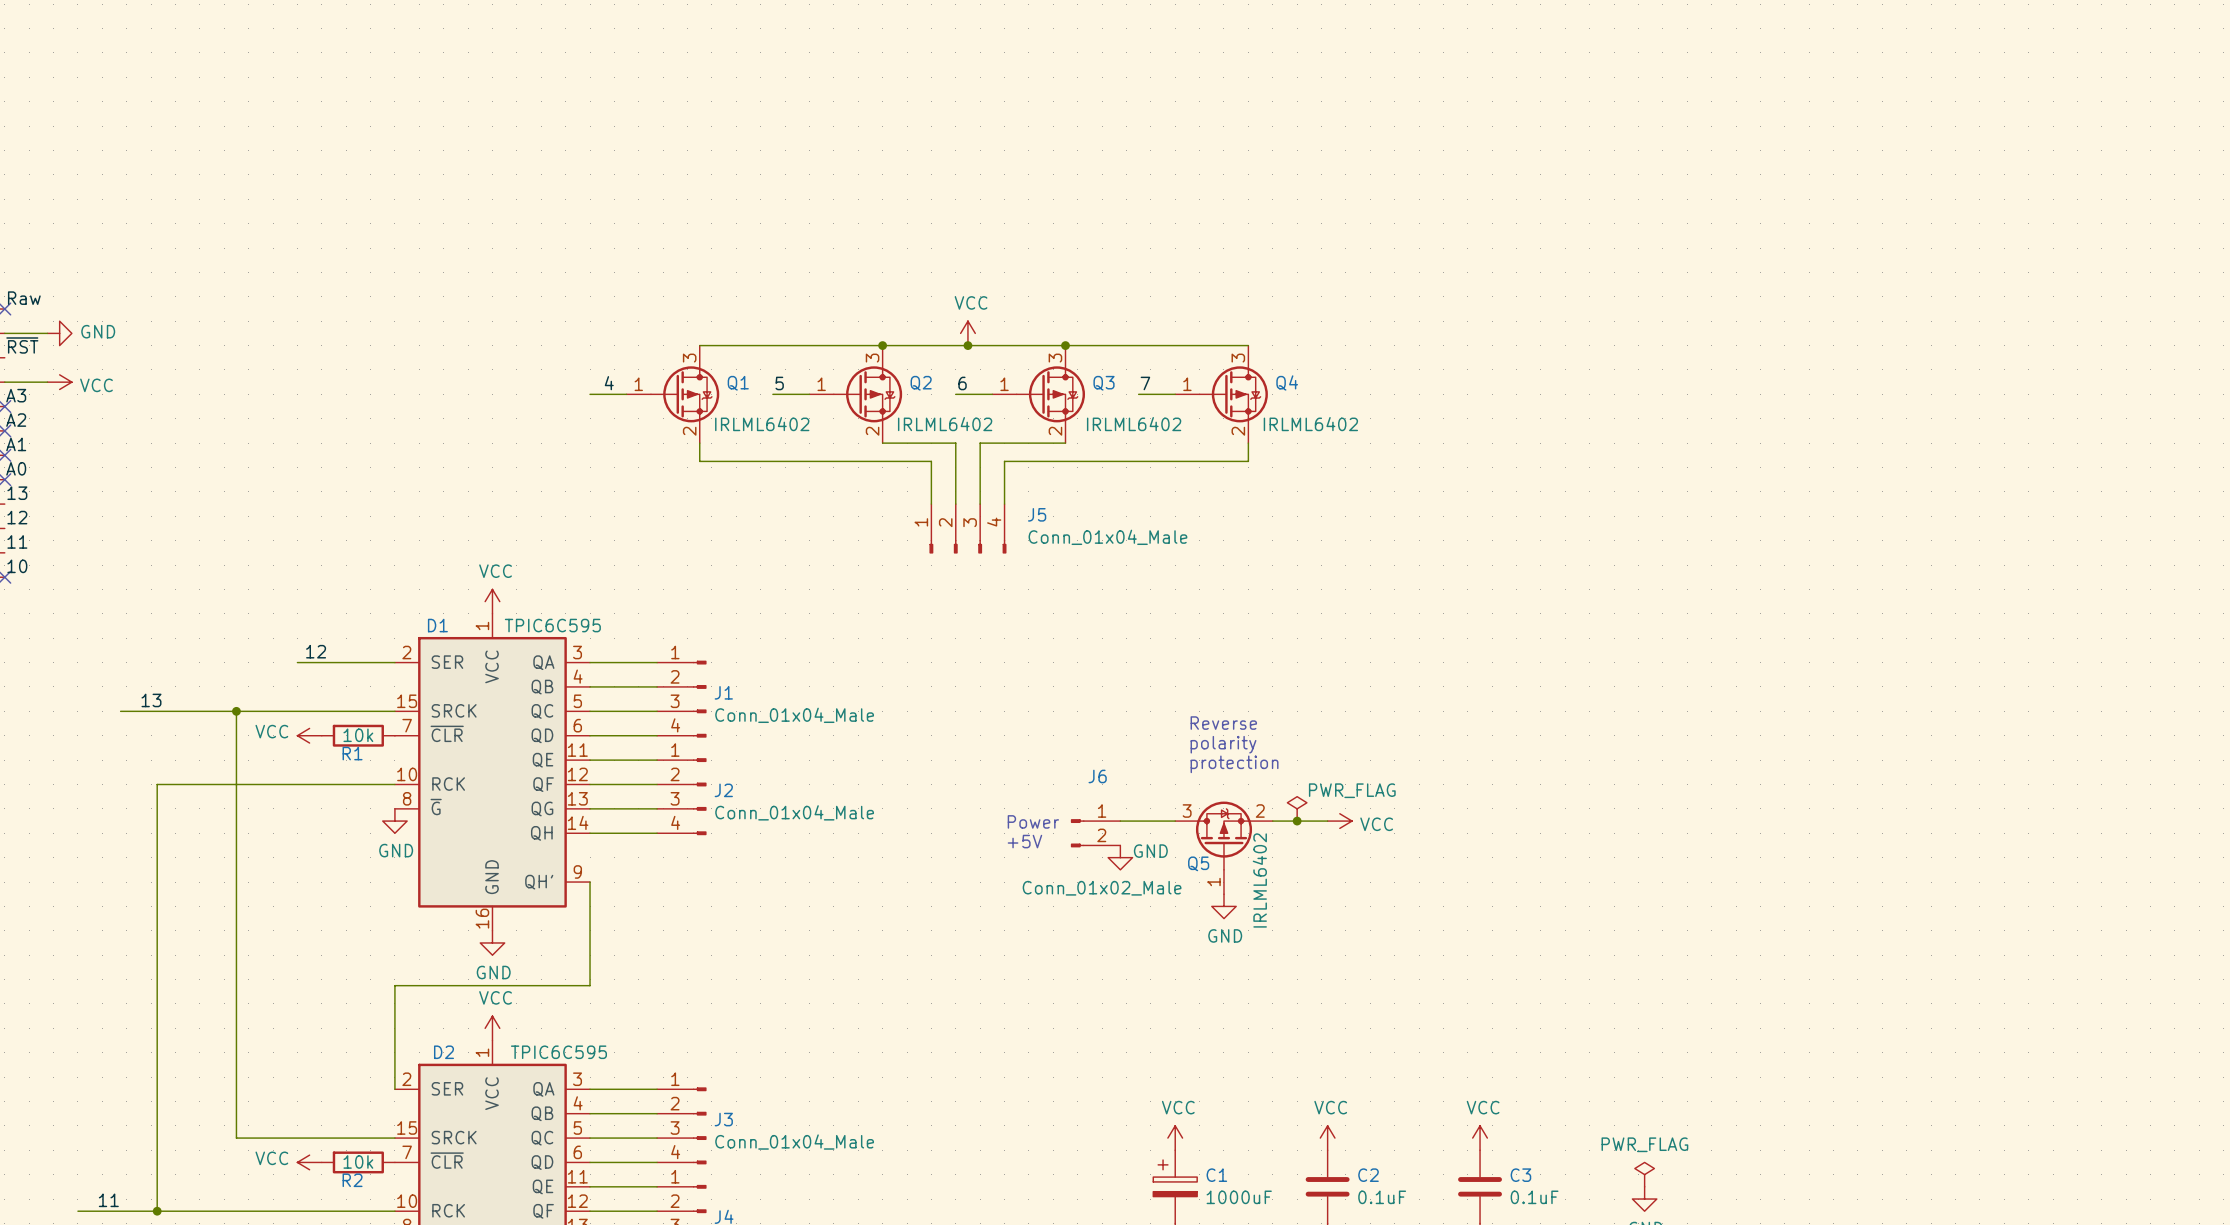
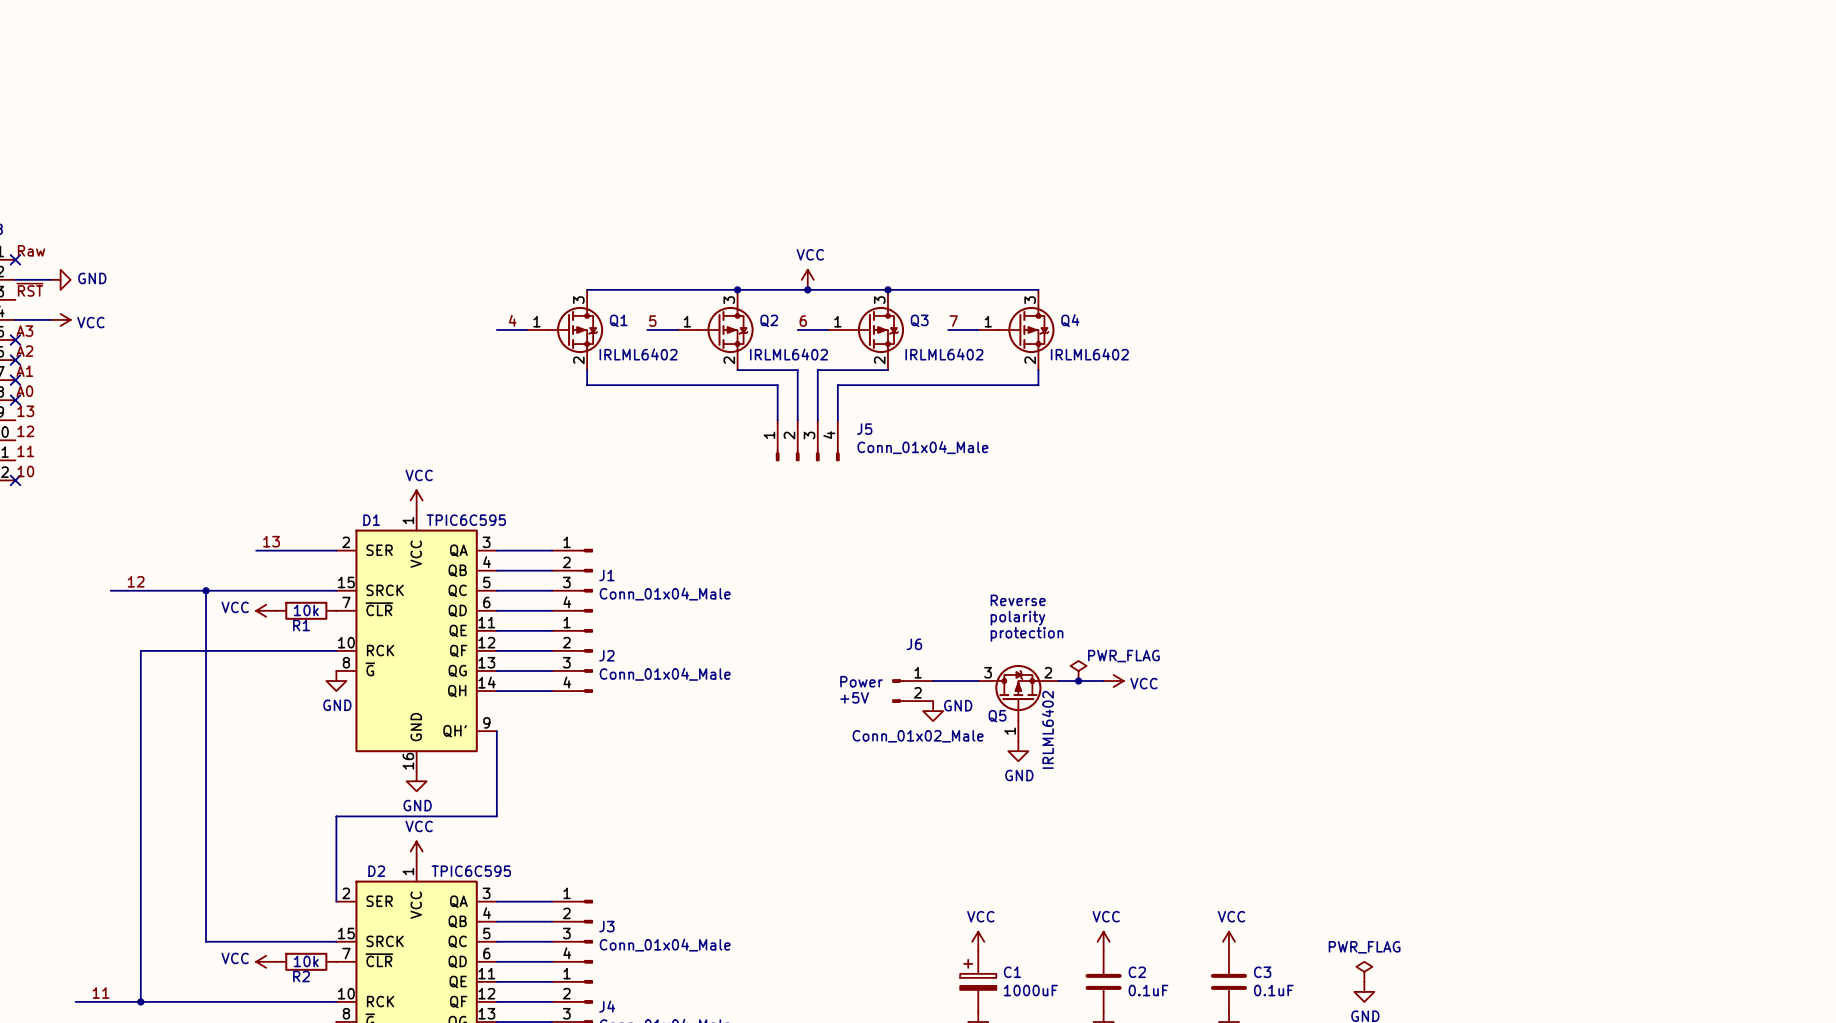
label: 12 (316, 651) -> 13 (271, 541)
label: 13 (151, 700) -> 12 (136, 581)

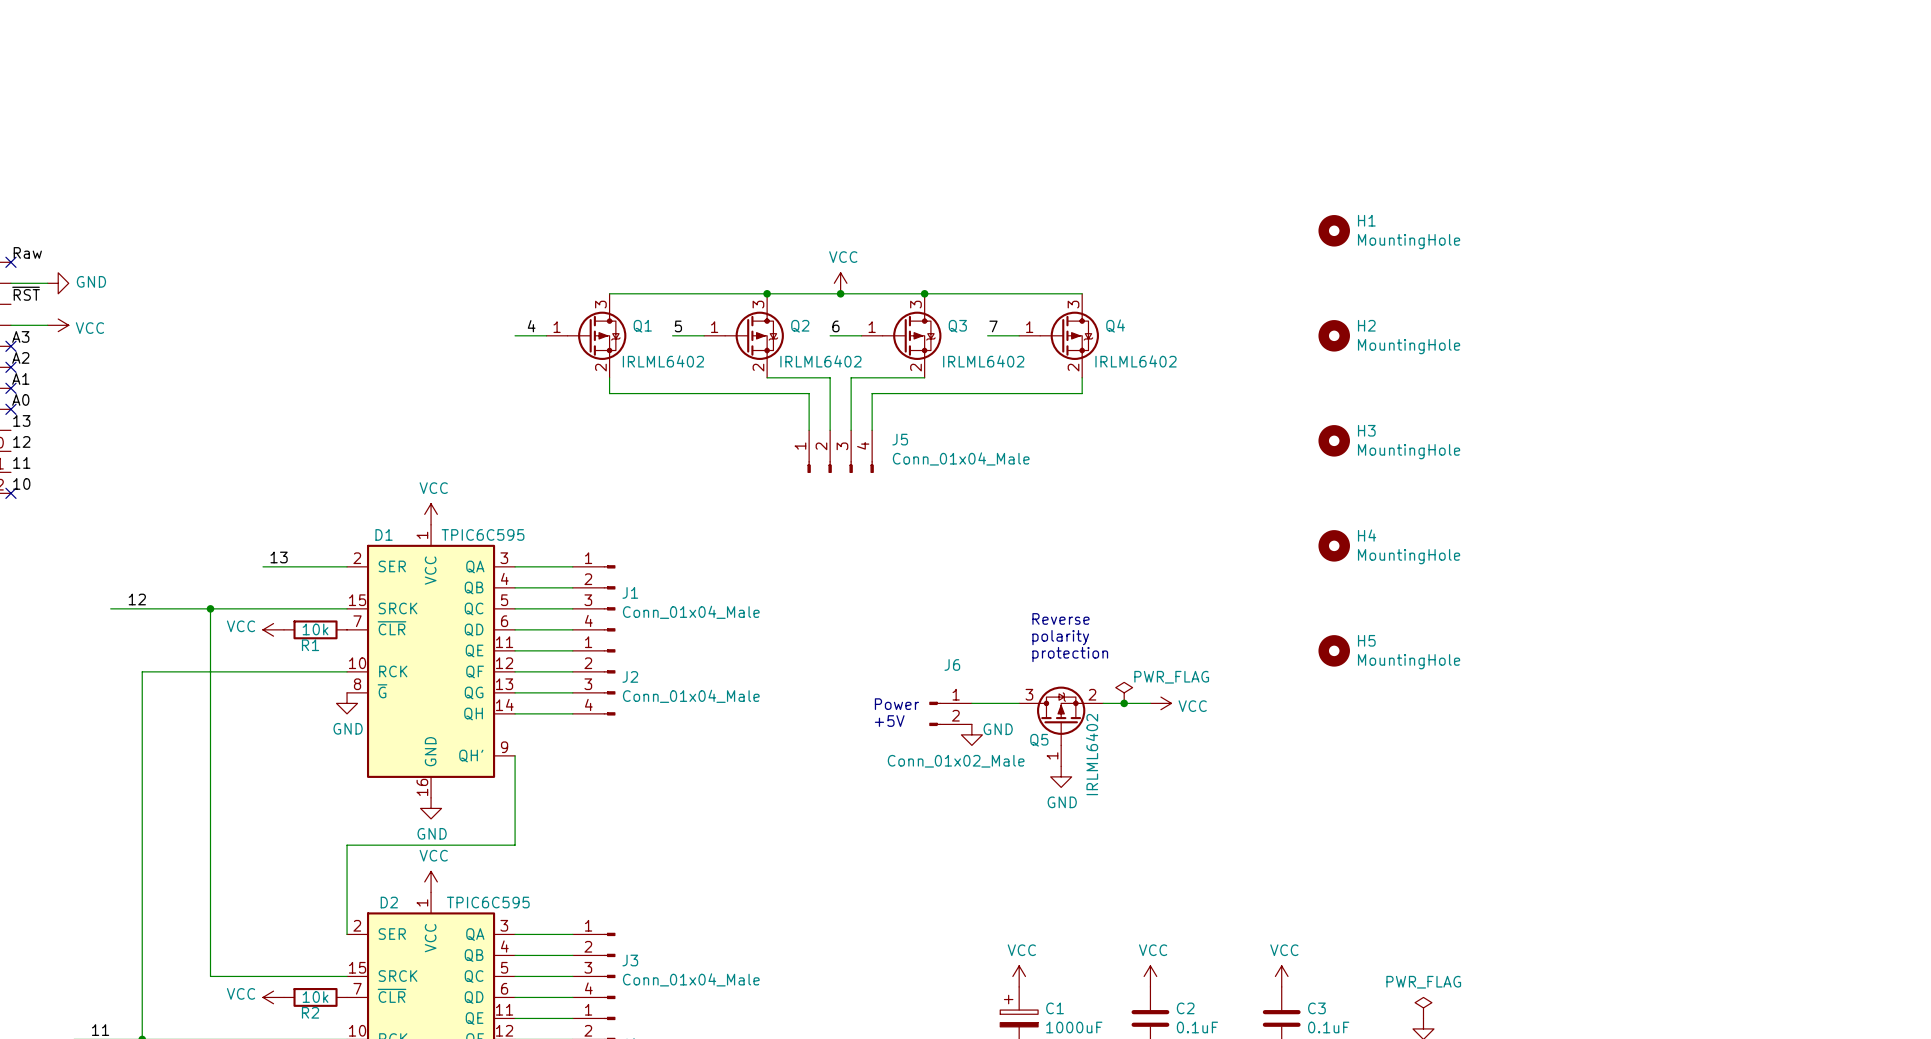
H1: none -> MountingHole (1334, 230)
H2: none -> MountingHole (1334, 335)
H3: none -> MountingHole (1334, 440)
H4: none -> MountingHole (1334, 545)
H5: none -> MountingHole (1334, 650)

